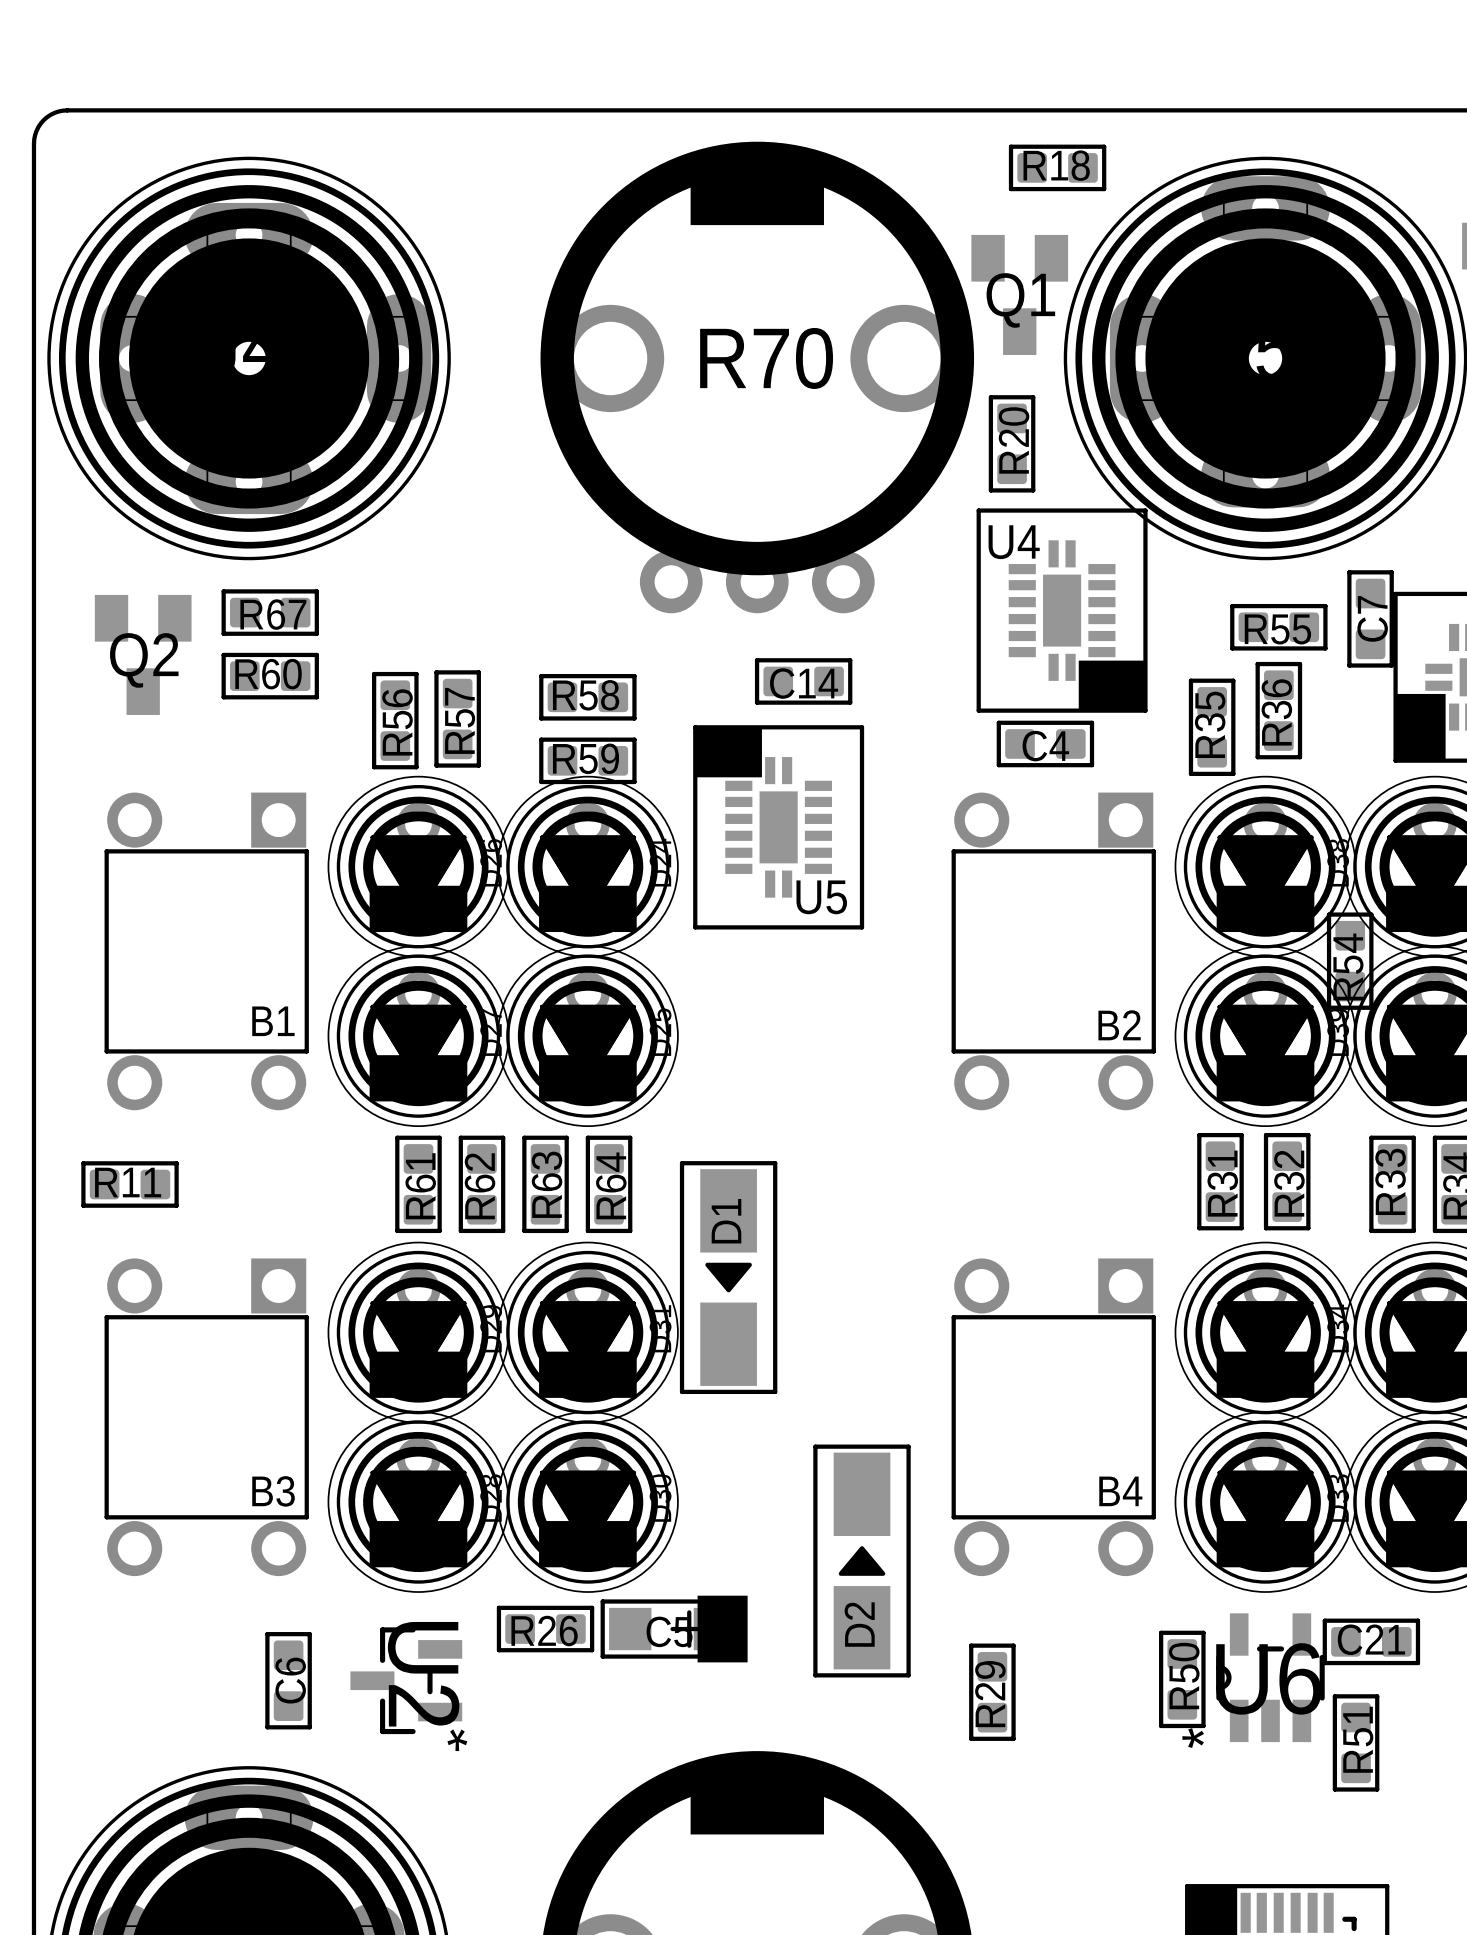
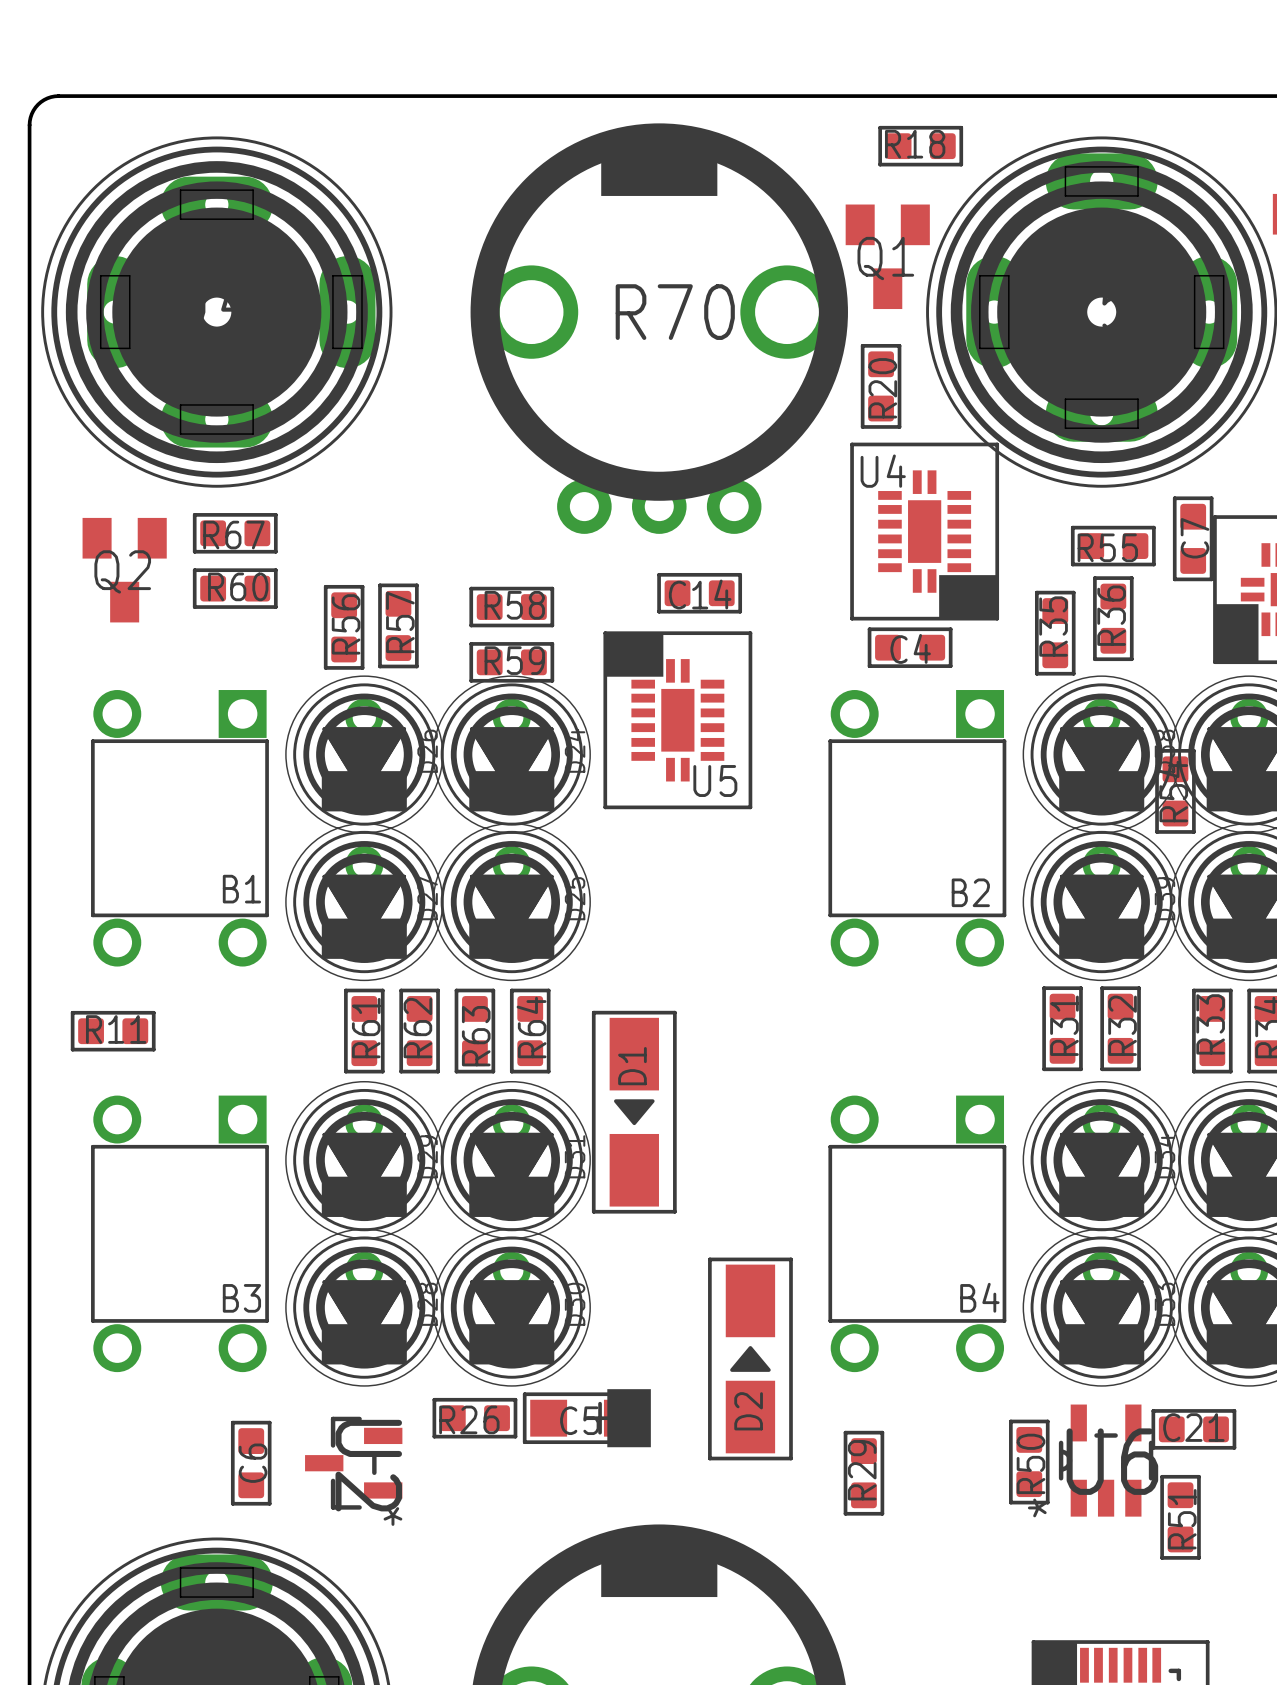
R54 position: (1350, 961) -> (1175, 791)

